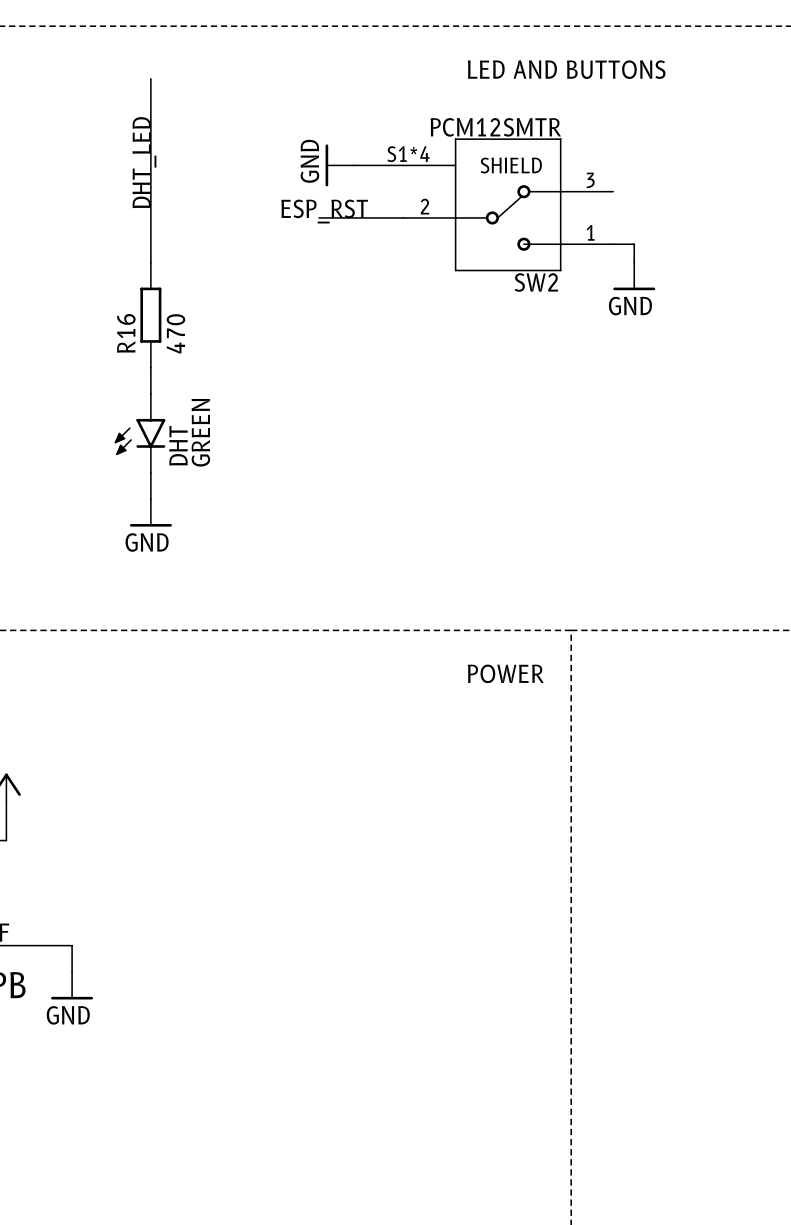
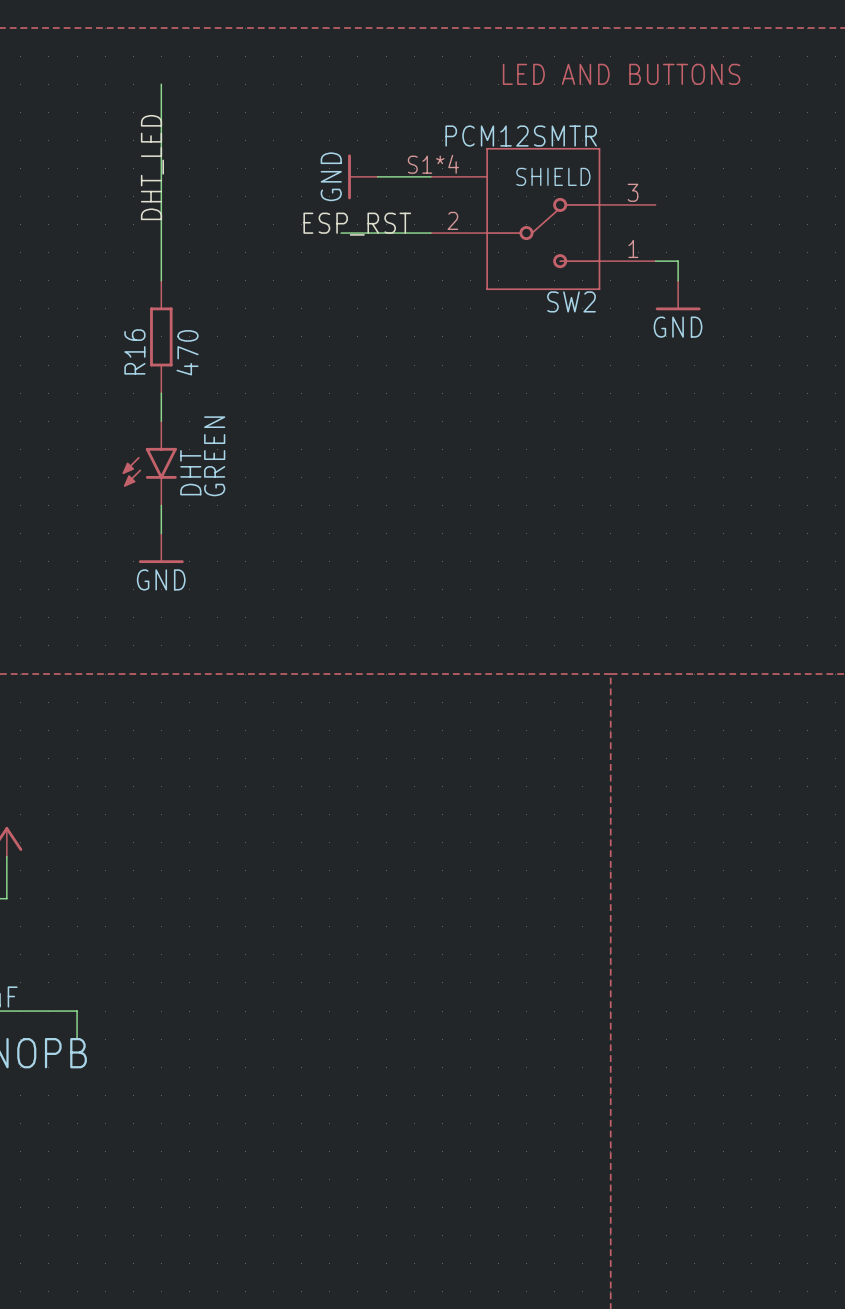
text: POWER (505, 673) -> none
power symbol: GND (72, 985) -> none

